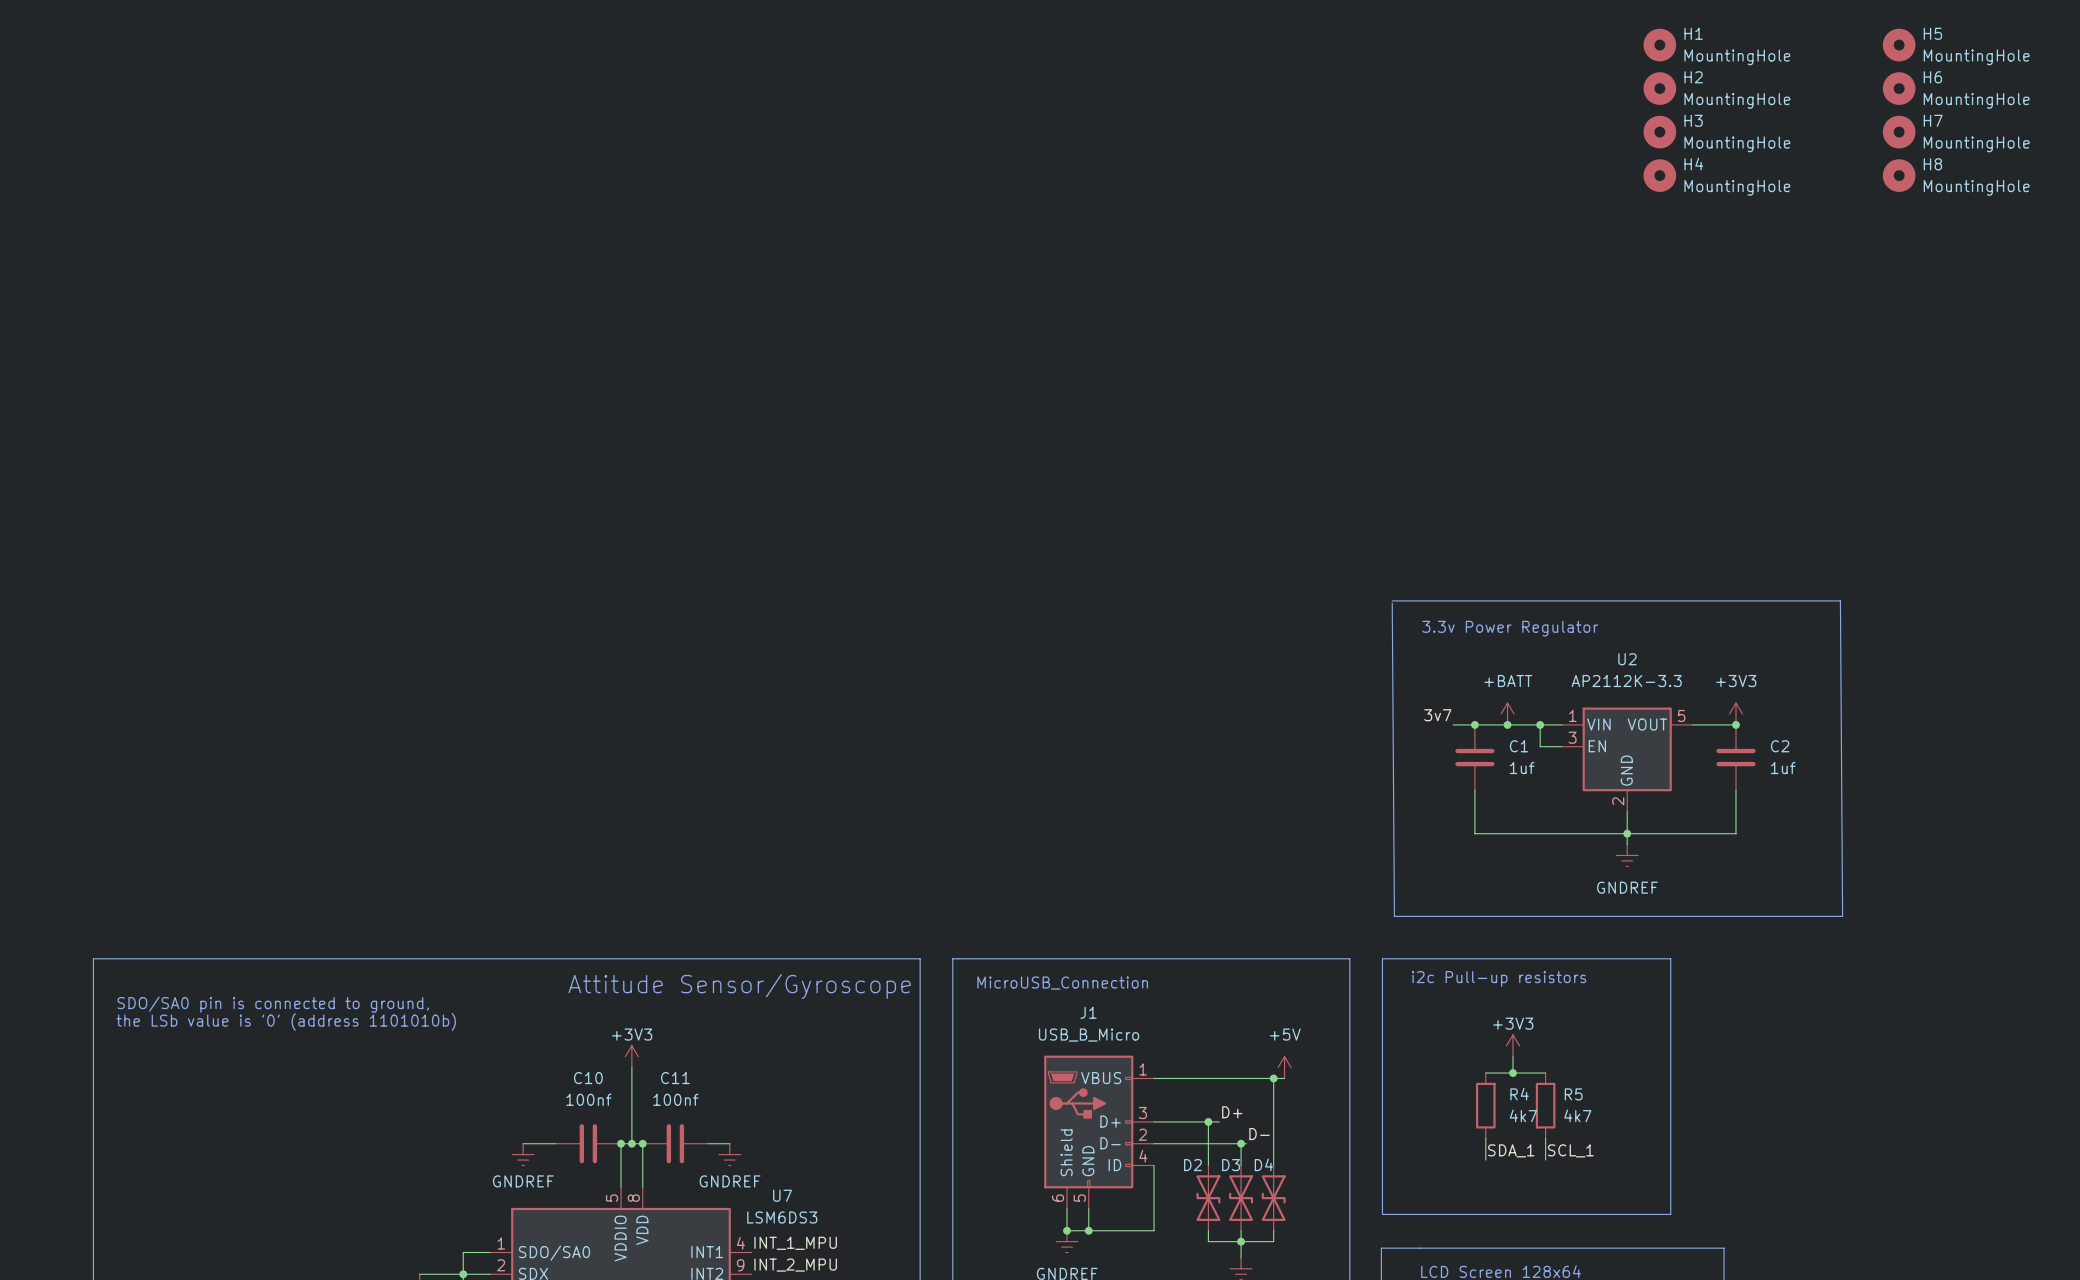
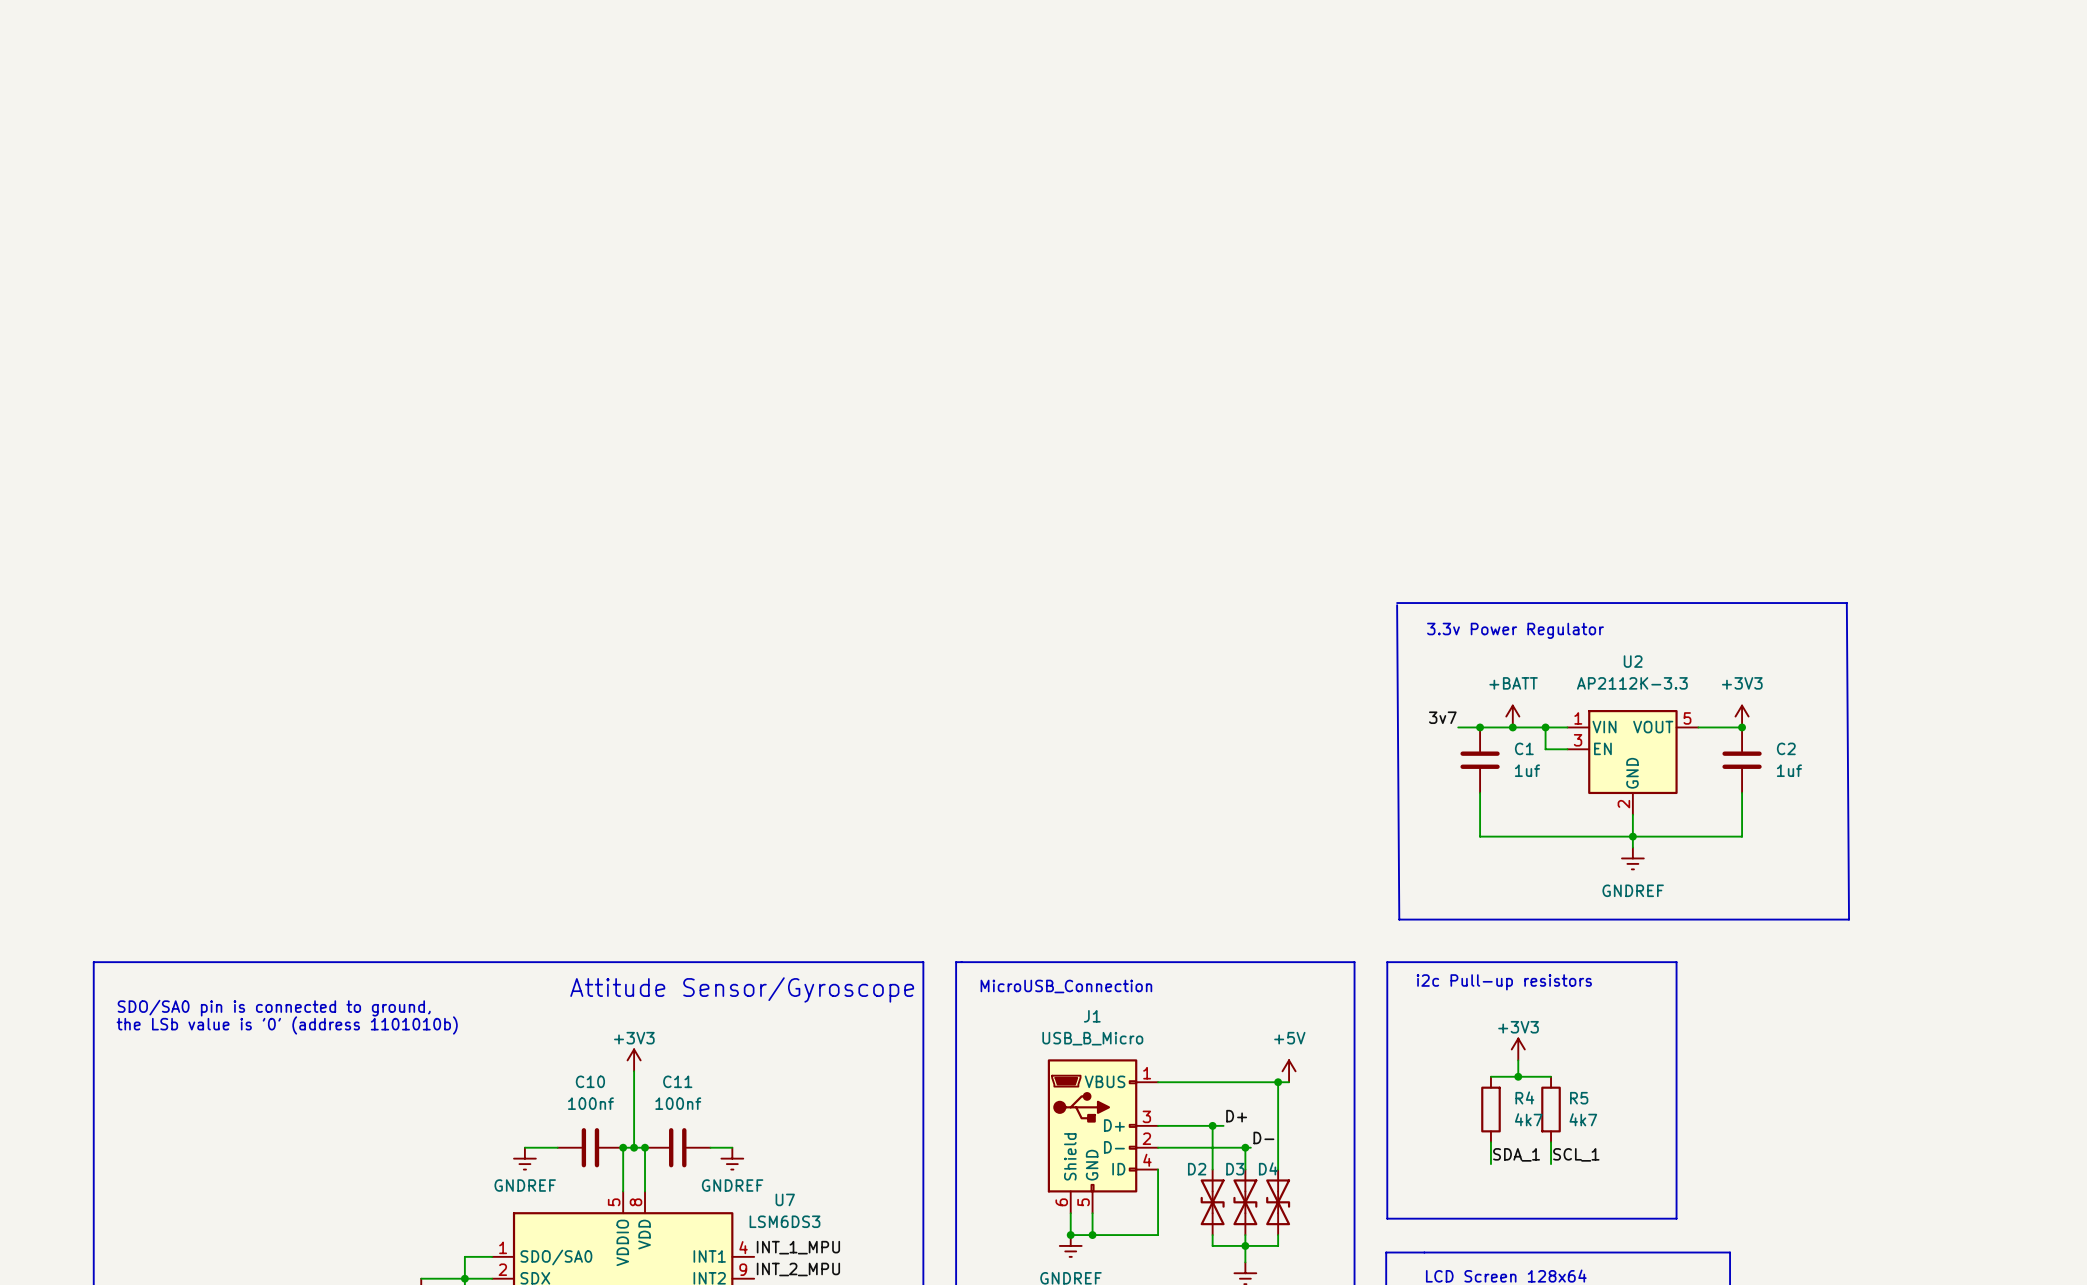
H1: MountingHole (1659, 45) -> none
H5: MountingHole (1899, 45) -> none
H2: MountingHole (1659, 88) -> none
H6: MountingHole (1899, 88) -> none
H3: MountingHole (1659, 132) -> none
H7: MountingHole (1899, 132) -> none
H4: MountingHole (1659, 175) -> none
H8: MountingHole (1899, 175) -> none

